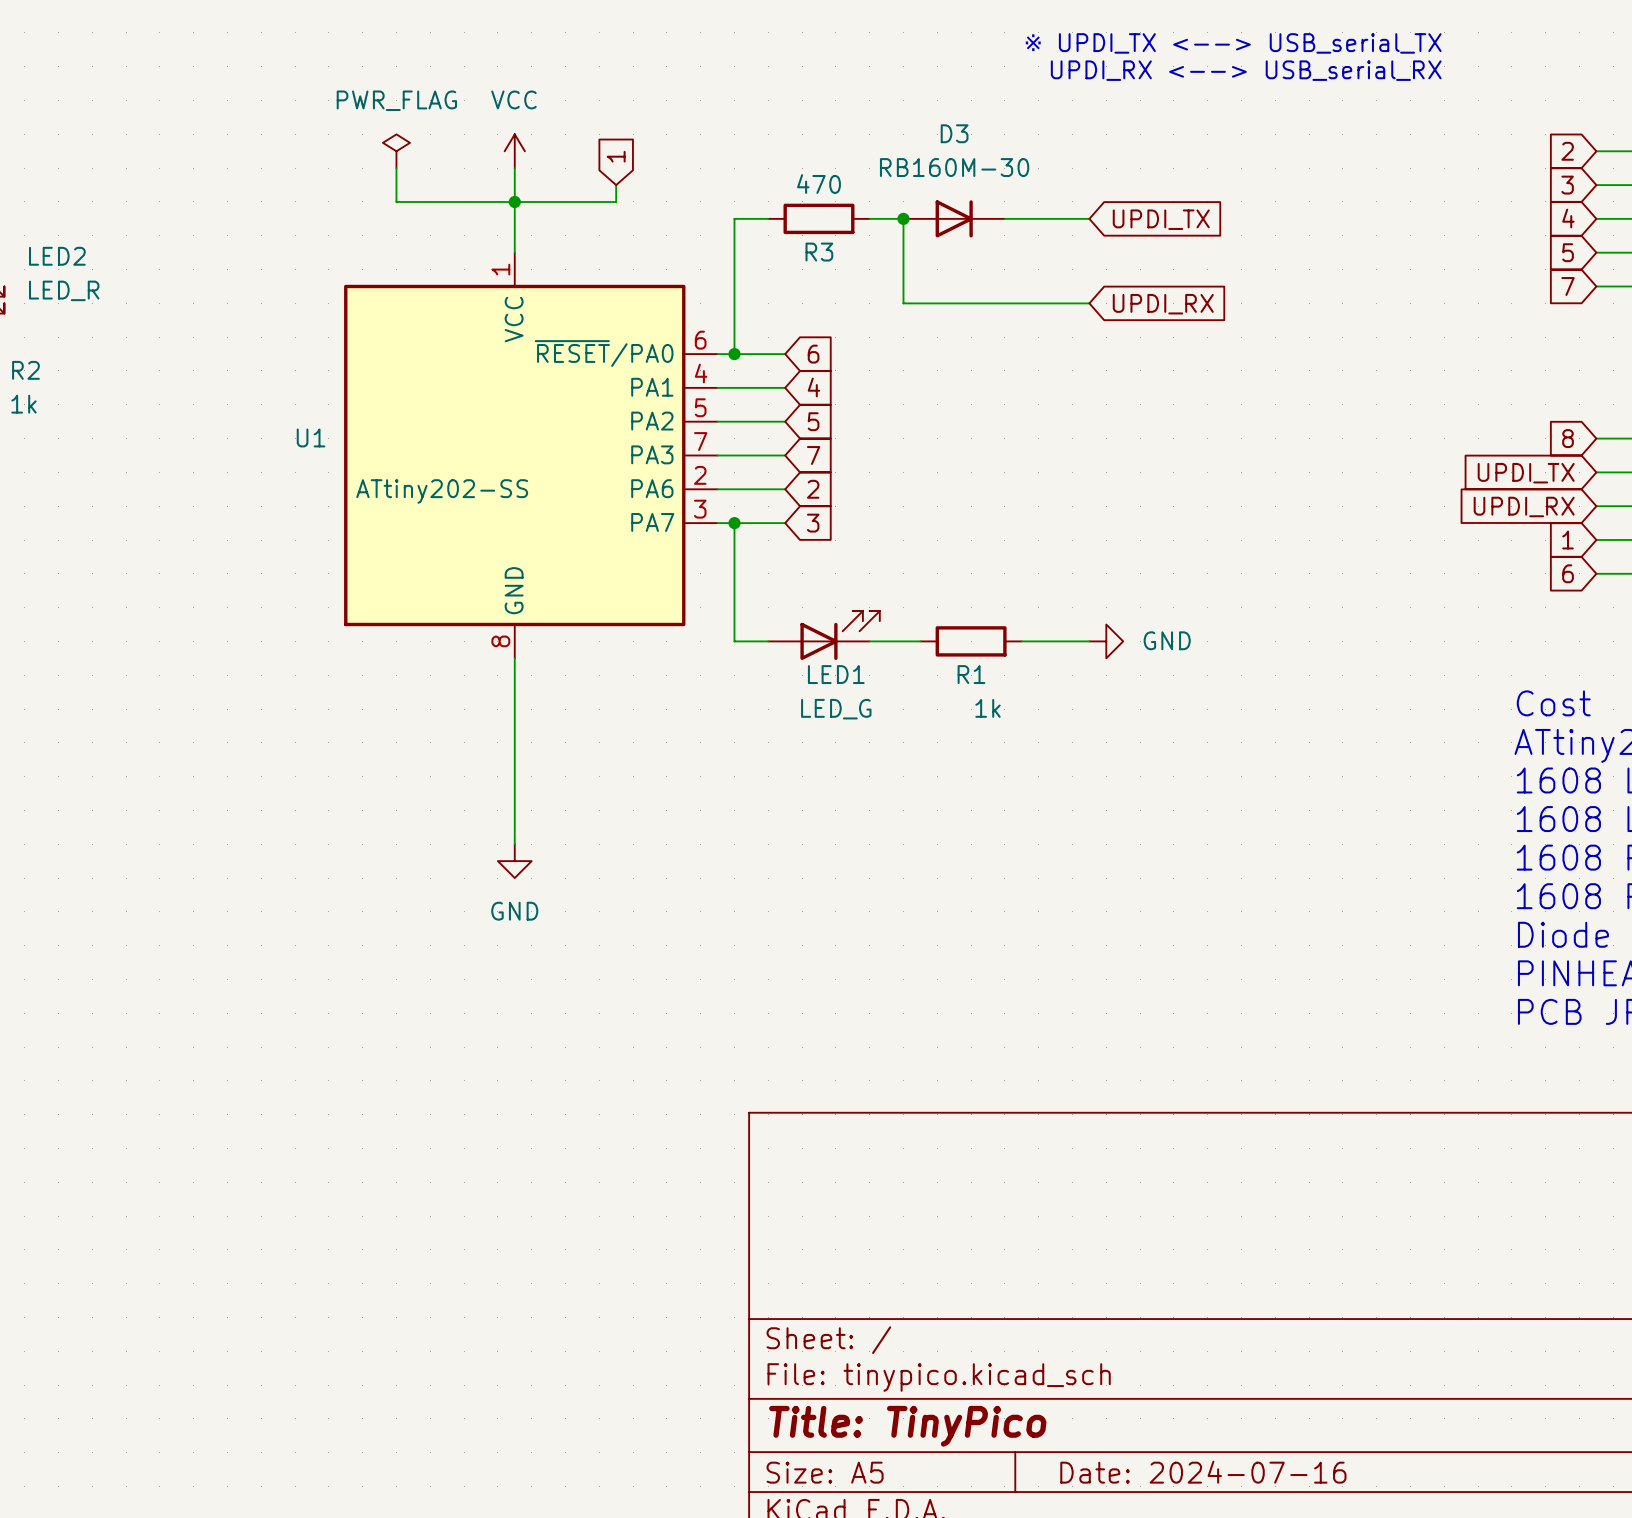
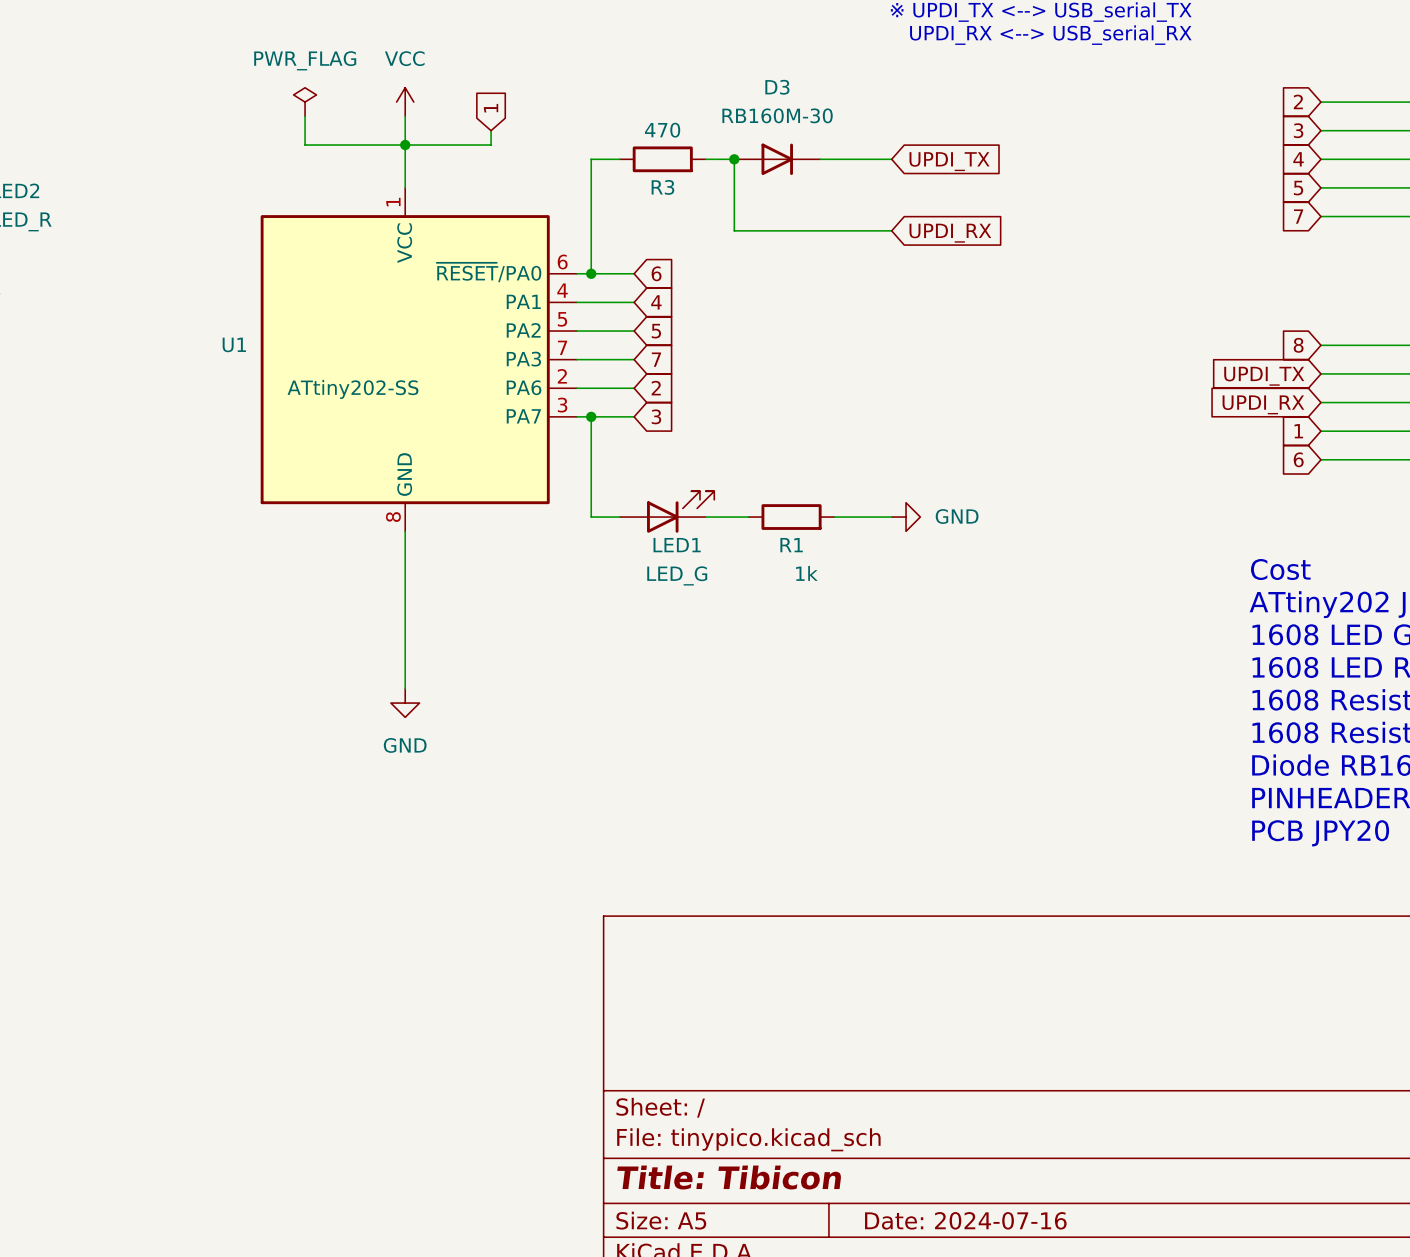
title block: Title: TinyPico (907, 1426) -> Title: Tibicon (729, 1177)

